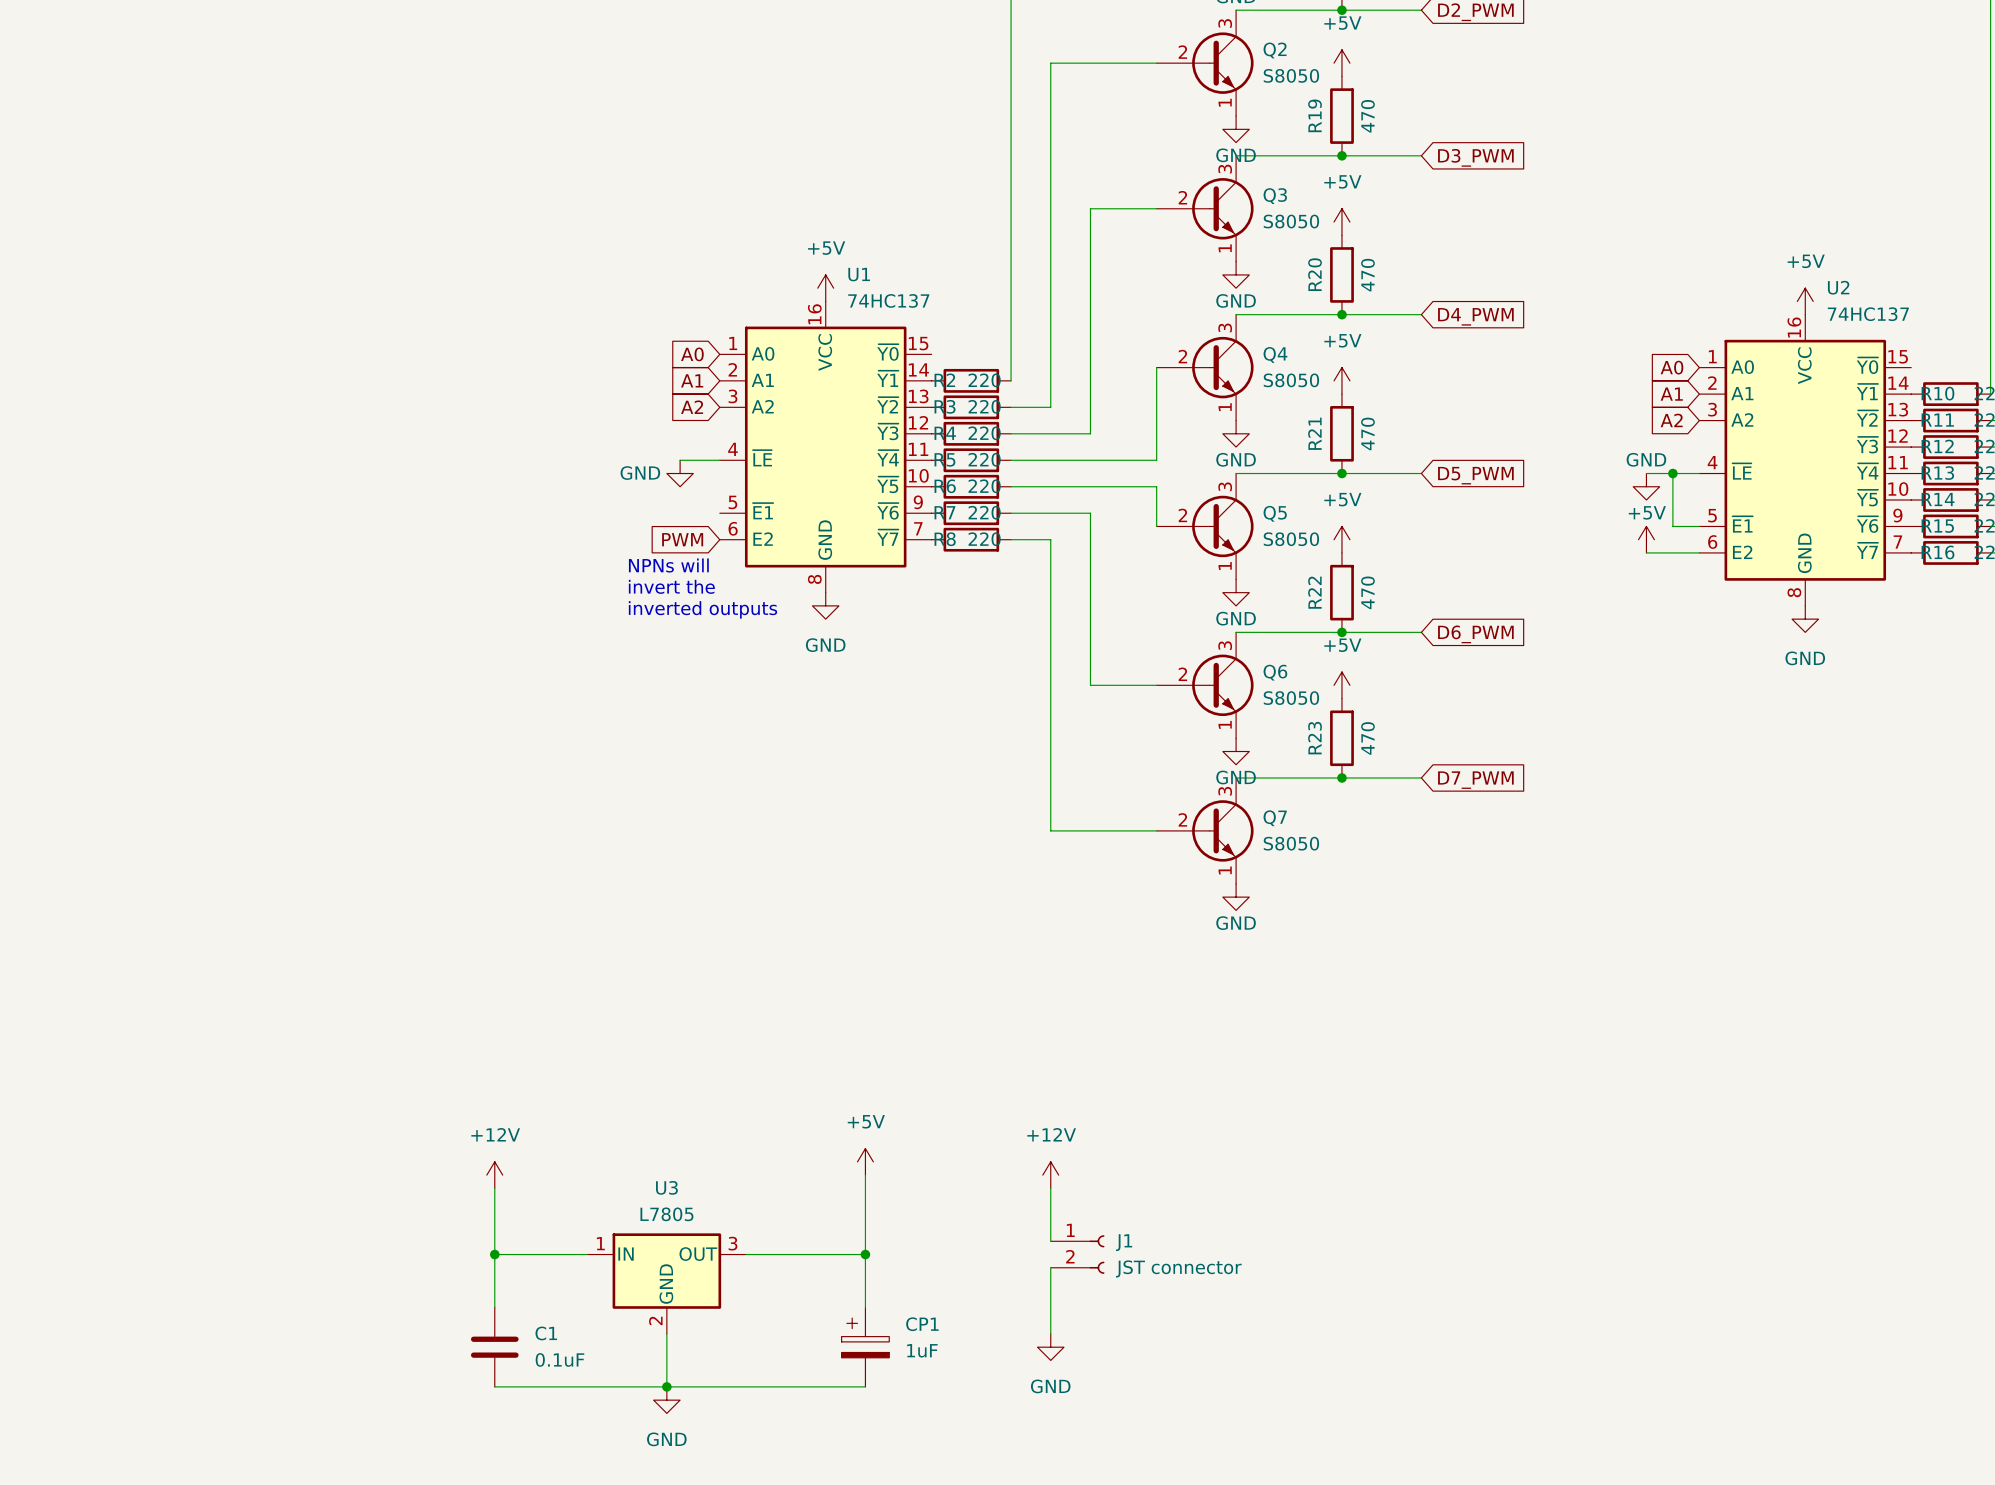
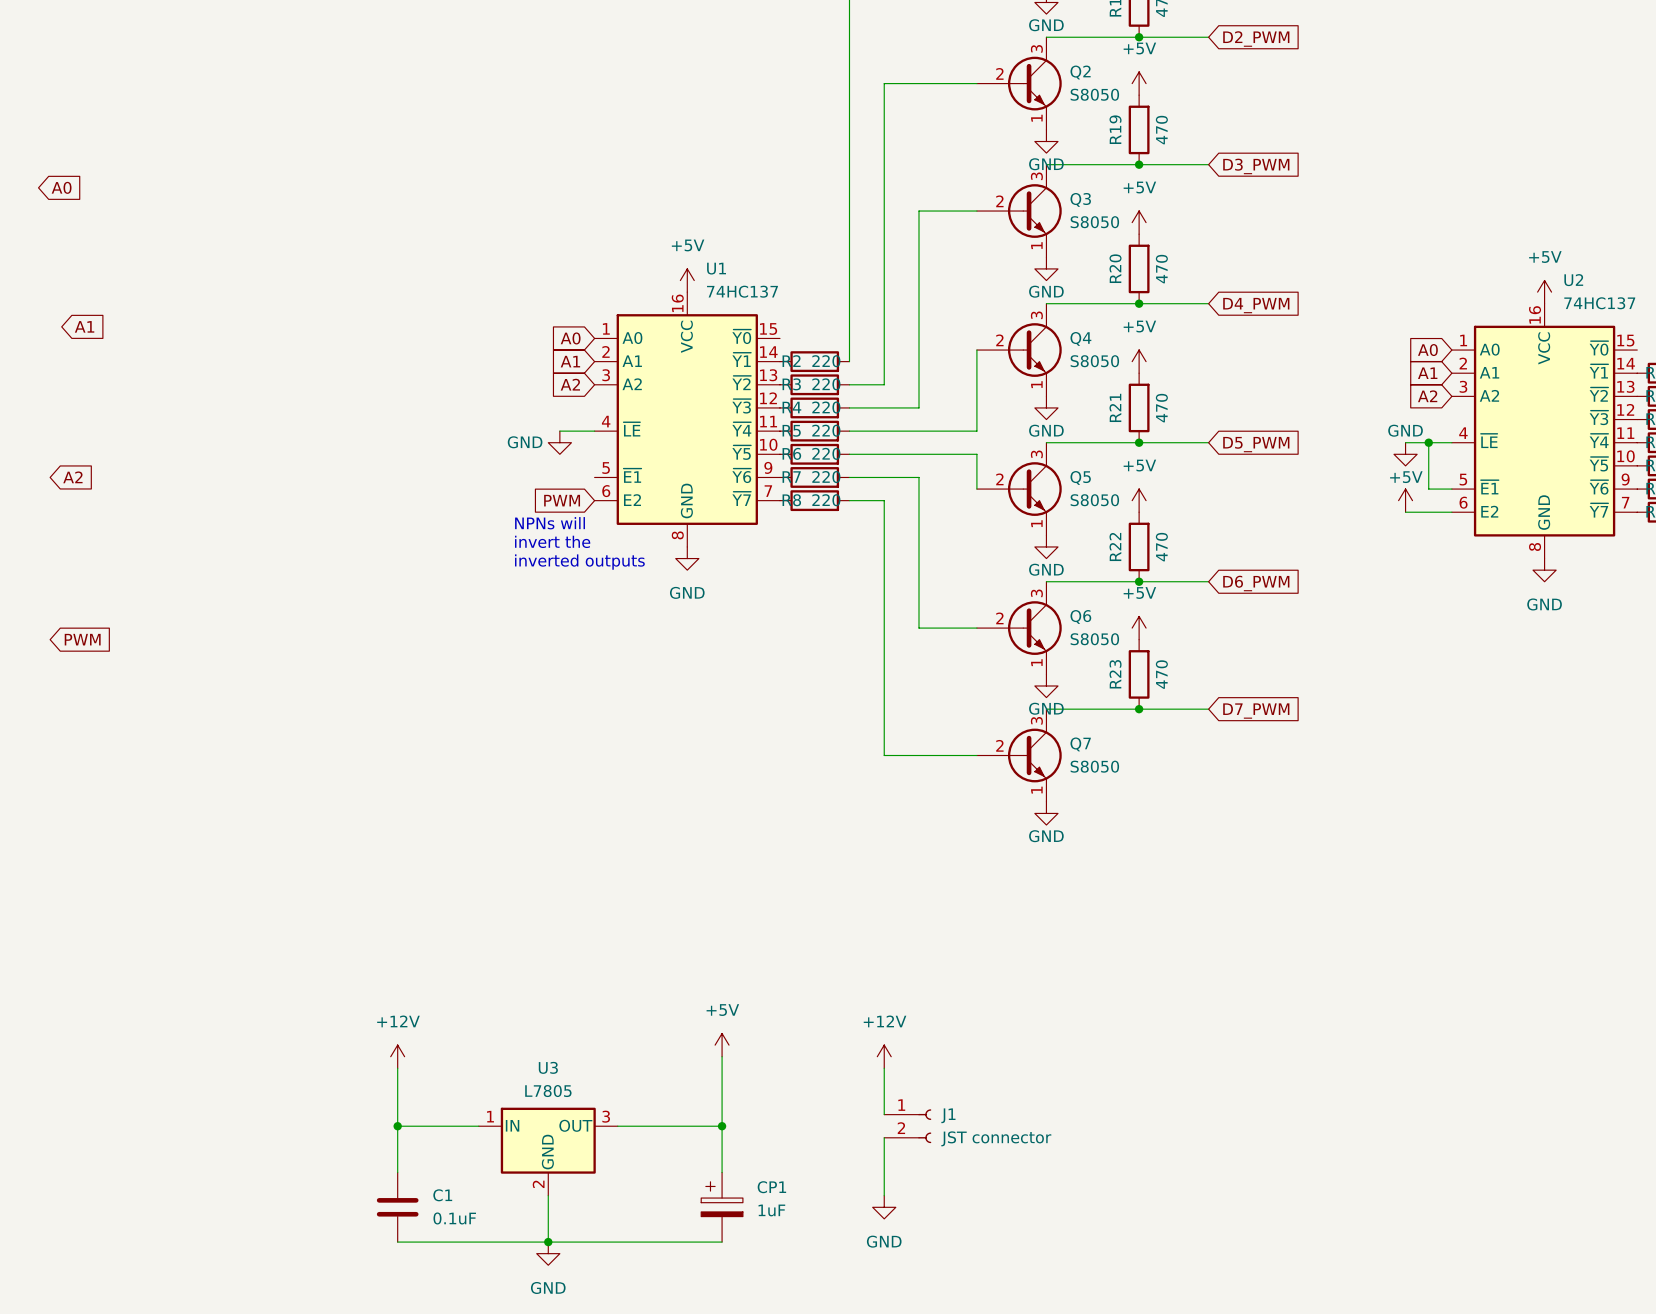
global label: none -> A0 (61, 187)
global label: none -> A1 (84, 326)
global label: none -> A2 (72, 477)
global label: none -> PWM (82, 639)

